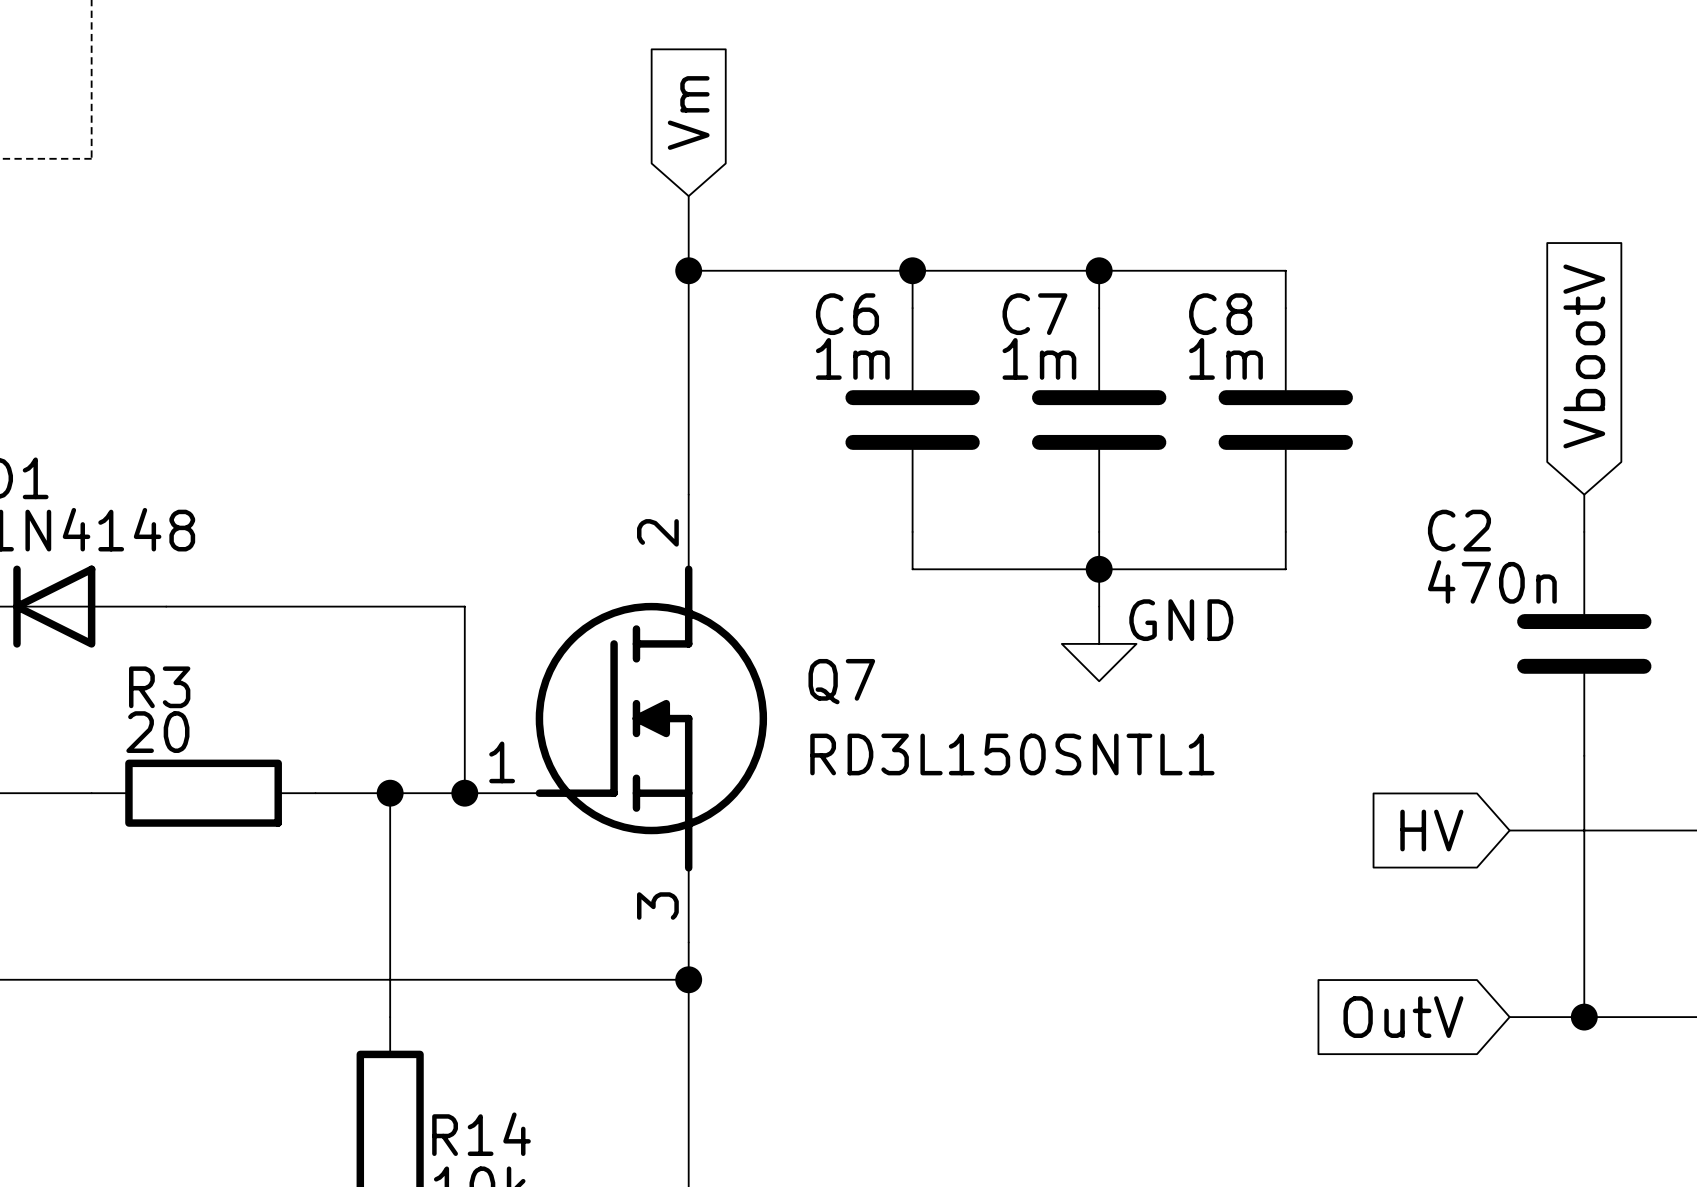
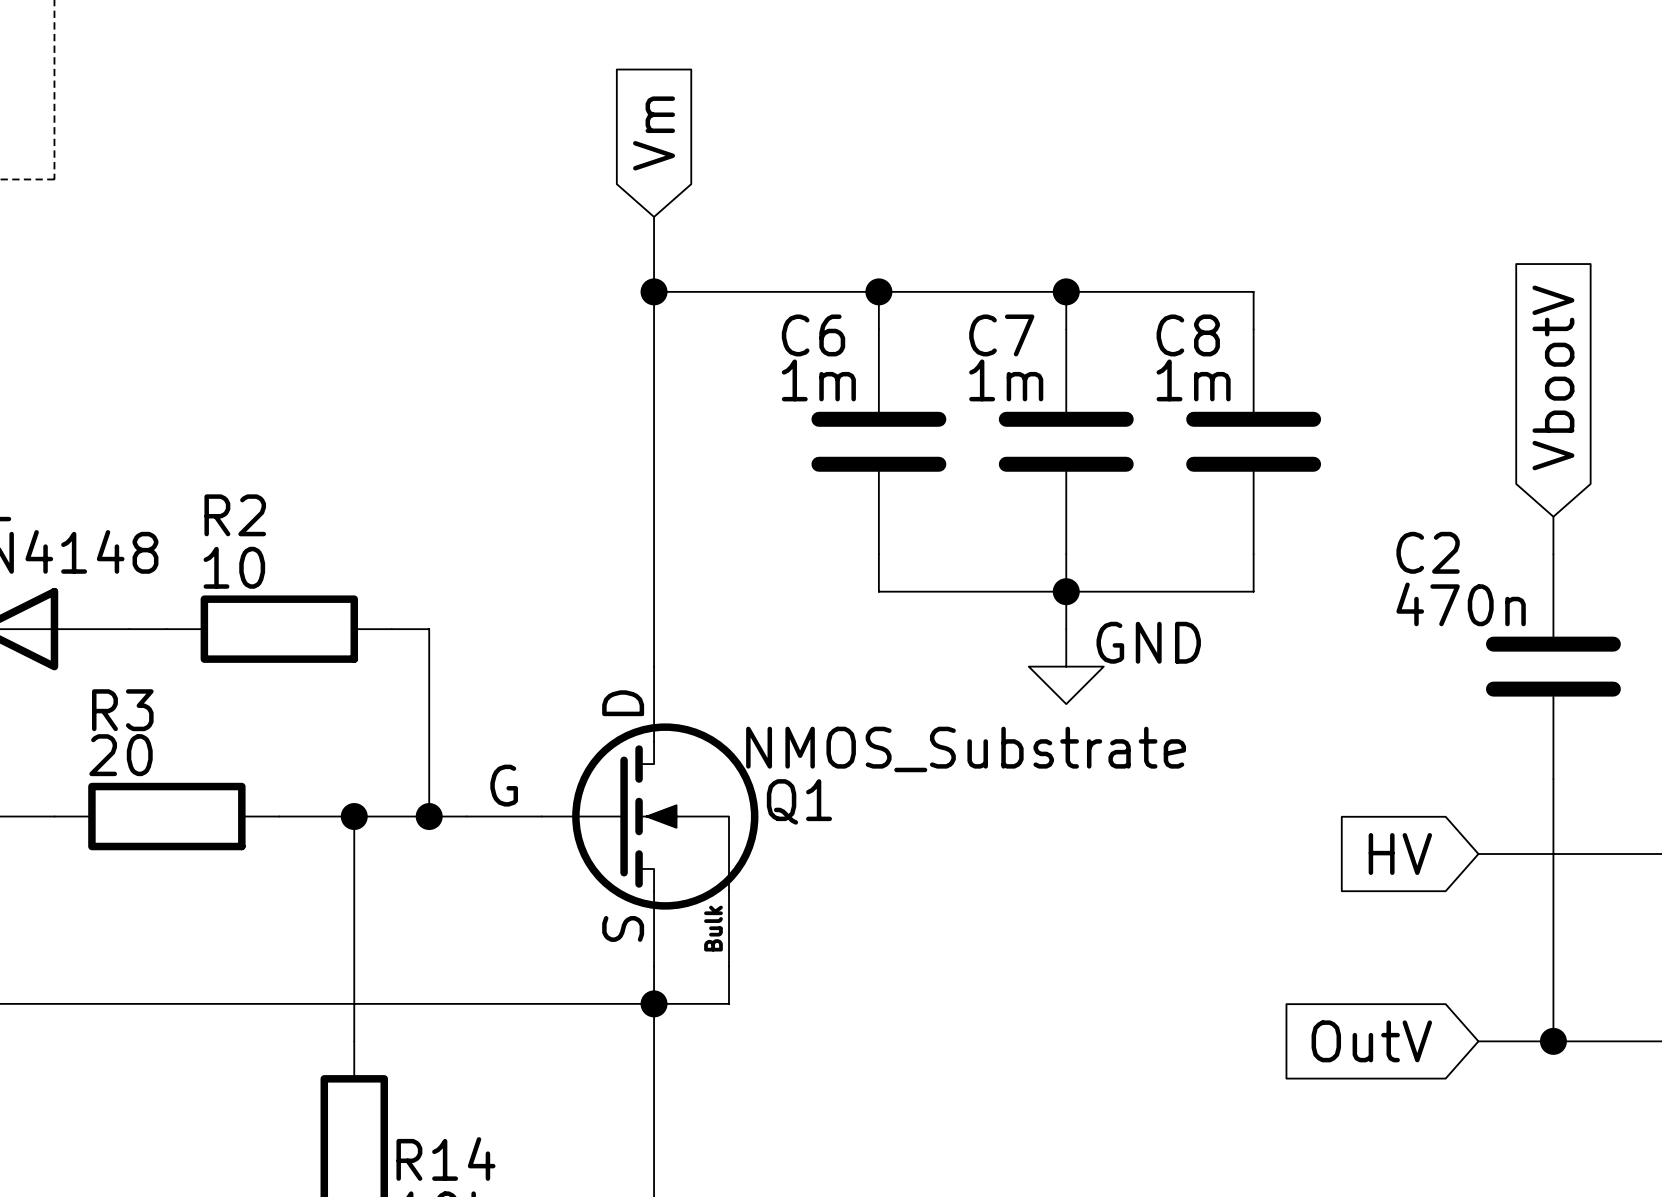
wire: (203, 606) (427, 606) -> none
R2: none -> 10 (279, 629)
Q7: RD3L150SNTL1 (615, 718) -> none
Q1: none -> NMOS_Substrate (612, 816)
wire: none -> (728, 966) (728, 1003) (654, 1003)

